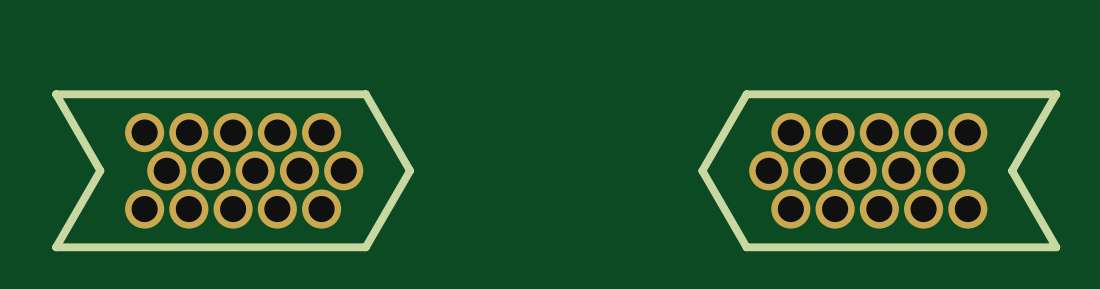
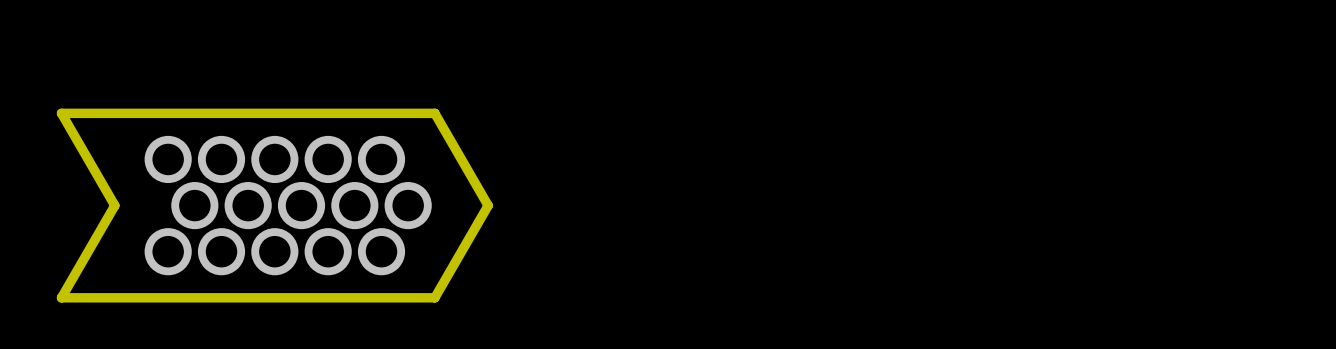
board edge: (746, 94) (702, 170) (746, 247) (1056, 247) (1012, 170) (1056, 94) (746, 94) -> none
via: (790, 132) -> none
via: (835, 132) -> none
via: (879, 132) -> none
via: (923, 132) -> none
via: (967, 132) -> none
via: (768, 170) -> none
via: (812, 170) -> none
via: (857, 170) -> none
via: (901, 170) -> none
via: (945, 170) -> none
via: (790, 209) -> none
via: (835, 209) -> none
via: (879, 209) -> none
via: (923, 209) -> none
via: (967, 209) -> none

